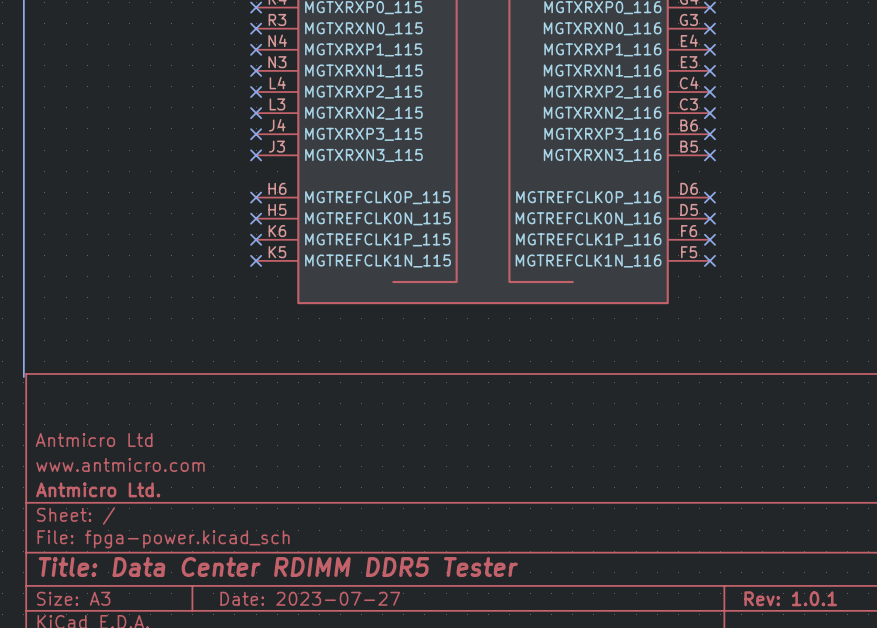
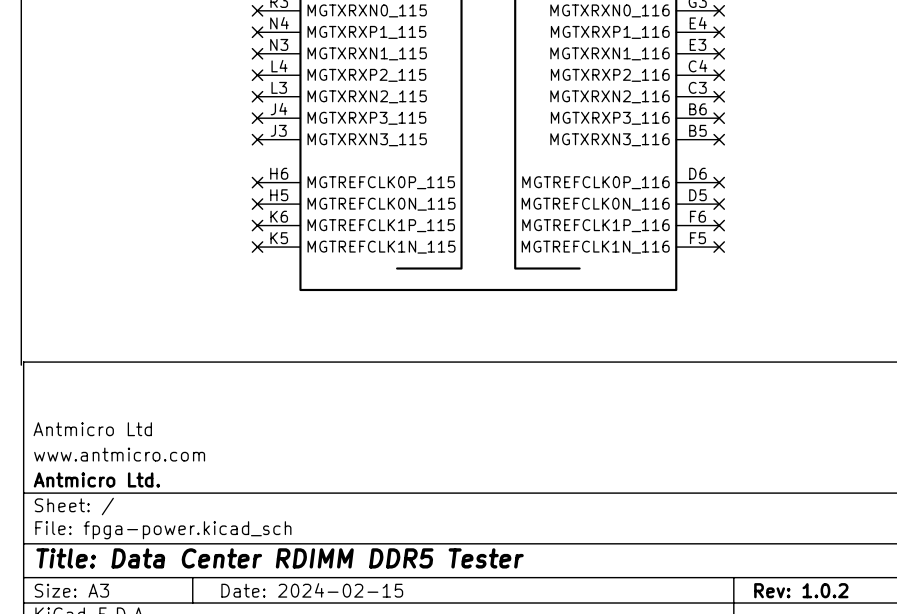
title block: Date: 2023-07-27 (310, 598) -> Date: 2024-02-15 (312, 590)
title block: Rev: 1.0.1 (790, 598) -> Rev: 1.0.2 (801, 590)

